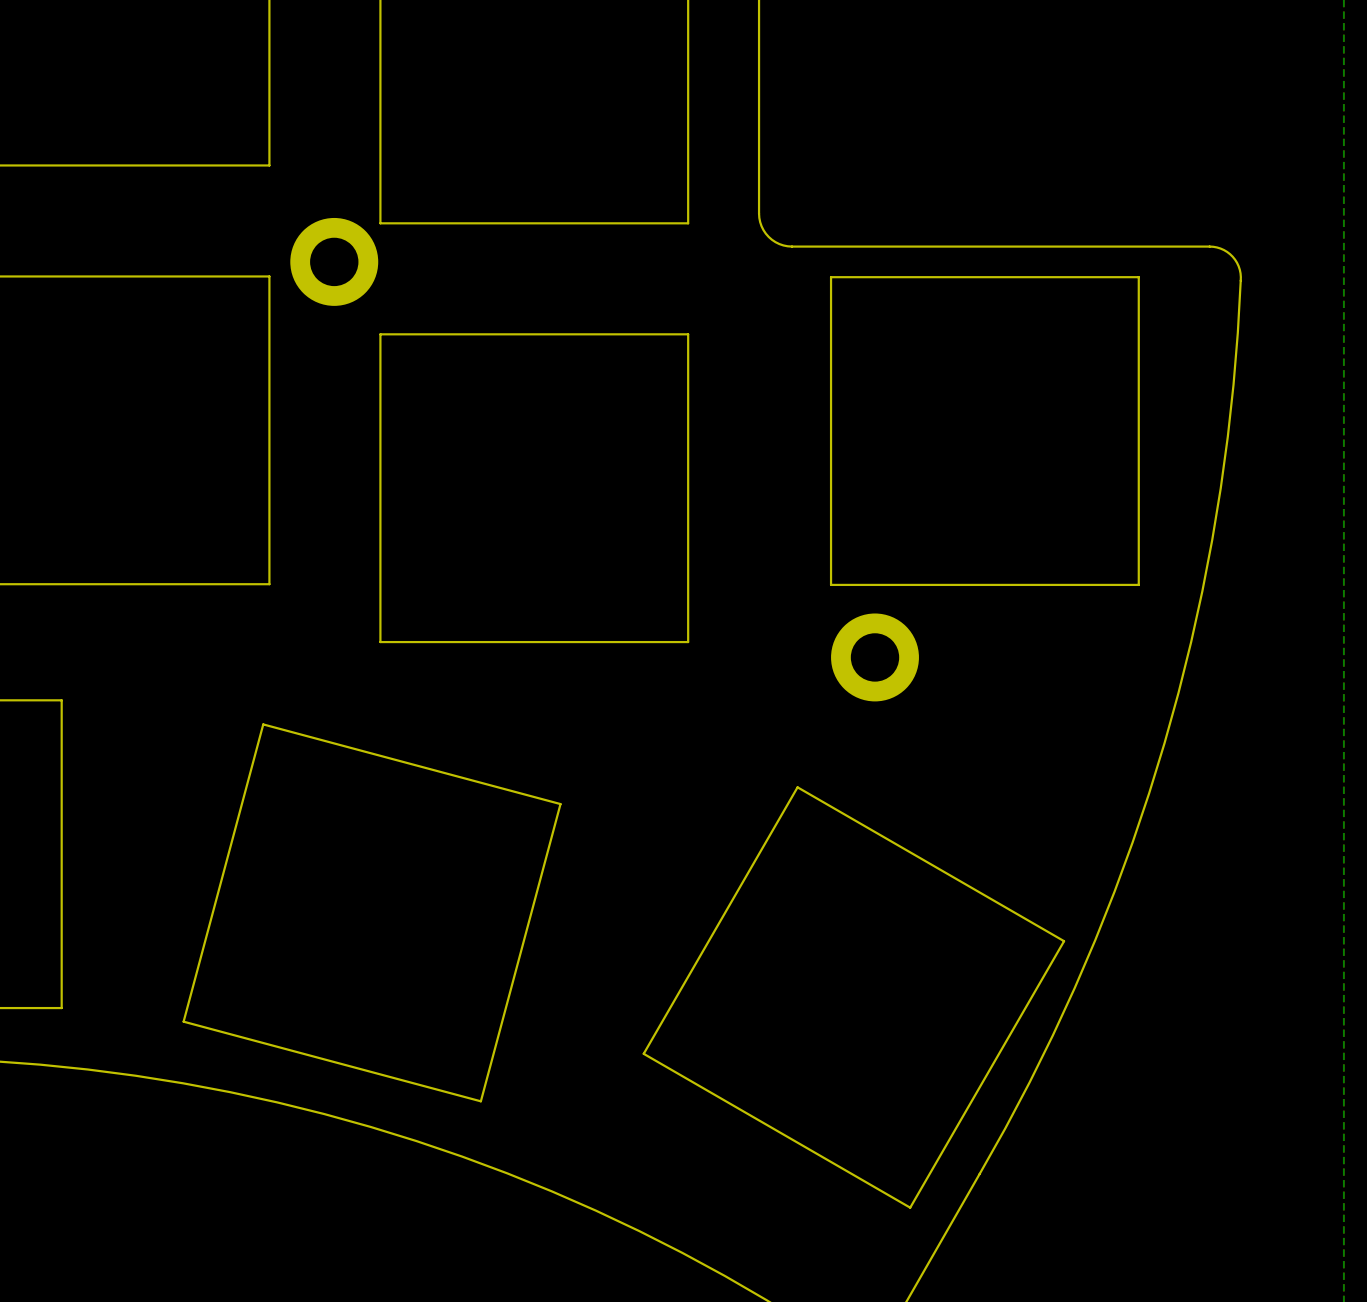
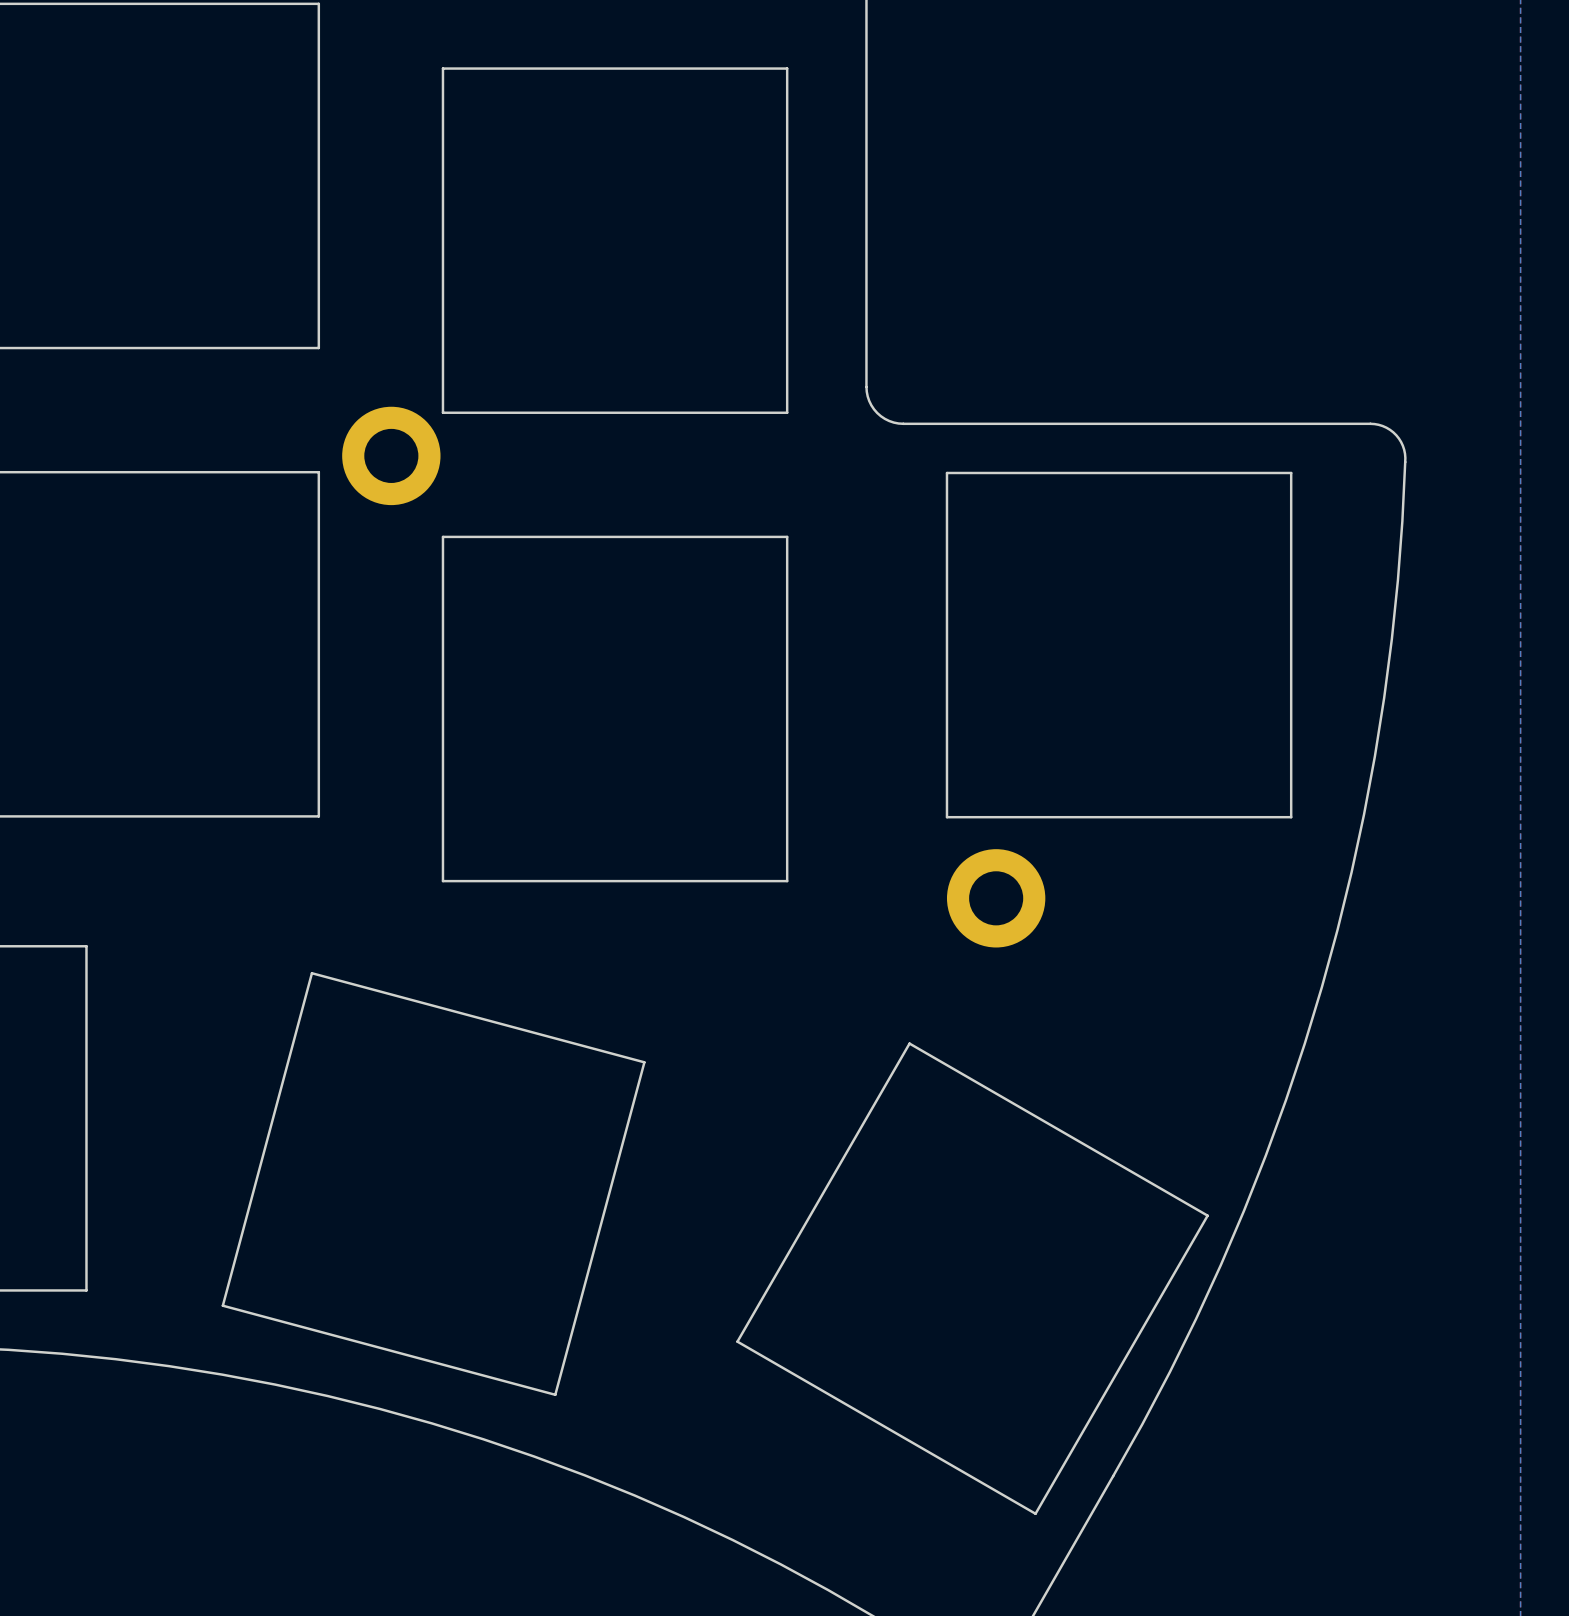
board edge: (759, 200) (759, 217) (763, 230) (771, 239) (787, 246) (1209, 246) (1220, 248) (1230, 254) (1239, 269) (1240, 280) (1233, 384) (1220, 488) (1202, 591) (1164, 743) (1132, 842) (1074, 988) (1029, 1082) (979, 1173) -> (866, 386) (869, 401) (877, 413) (889, 421) (898, 423) (1370, 423) (1382, 426) (1393, 432) (1404, 449) (1405, 462) (1397, 580) (1384, 697) (1364, 814) (1337, 929) (1321, 987) (1286, 1099) (1265, 1155) (1220, 1265) (1169, 1372) (1113, 1475)

